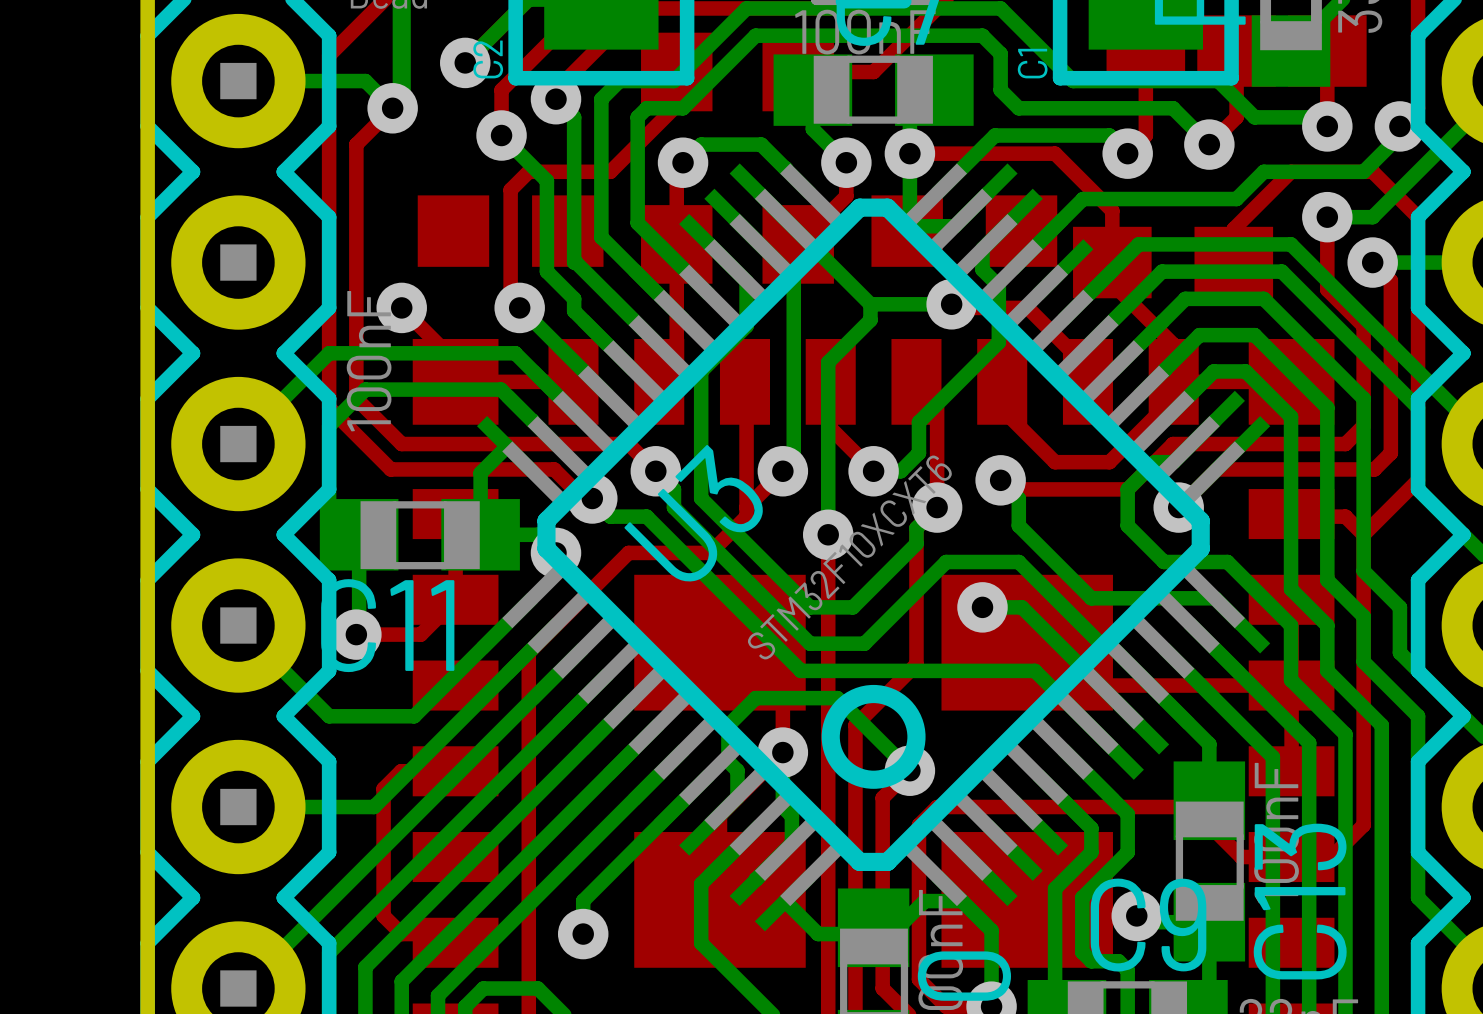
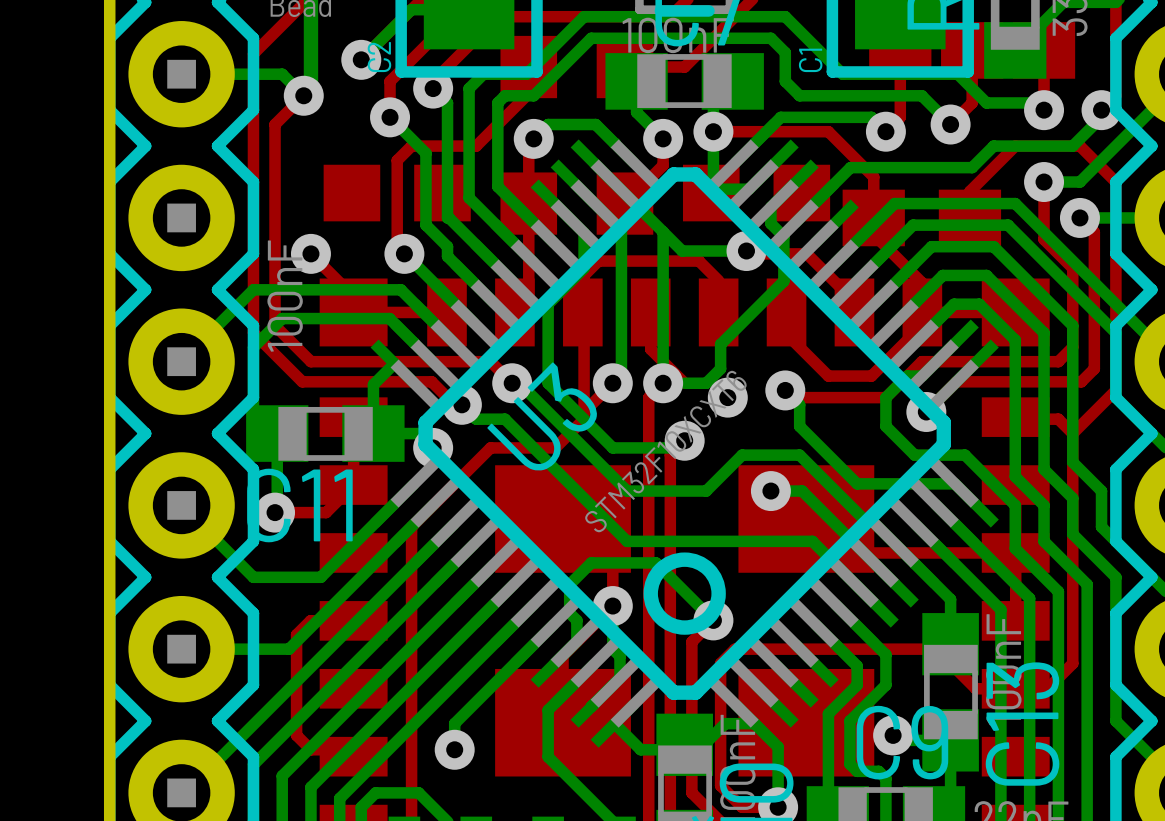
bottom track: none -> (663, 231) (663, 383)
bottom track: (870, 304) (870, 320) (828, 362) (828, 534) -> none
top track: none -> (718, 280) (699, 261) (598, 261) (584, 275) (582, 312)
top track: (916, 381) (937, 402) (937, 507) (916, 528) (916, 664) (855, 725) -> (684, 440) (670, 455) (670, 584)
bottom track: (655, 471) (673, 489) (673, 507) (810, 643) (864, 643) (900, 607) -> none
bottom track: (701, 471) (701, 498) (810, 607) -> (512, 383) (519, 383) (627, 491) (634, 491)
bottom track: none -> (548, 383) (612, 447) (677, 447) (684, 440)
top track: none -> (663, 383) (648, 397) (648, 433)
via position: (873, 471) -> (663, 383)
bottom track: (937, 507) (916, 528) (916, 543) (852, 607) -> (706, 491) (668, 491)
via position: (937, 507) -> (727, 397)
via position: (828, 534) -> (684, 440)

